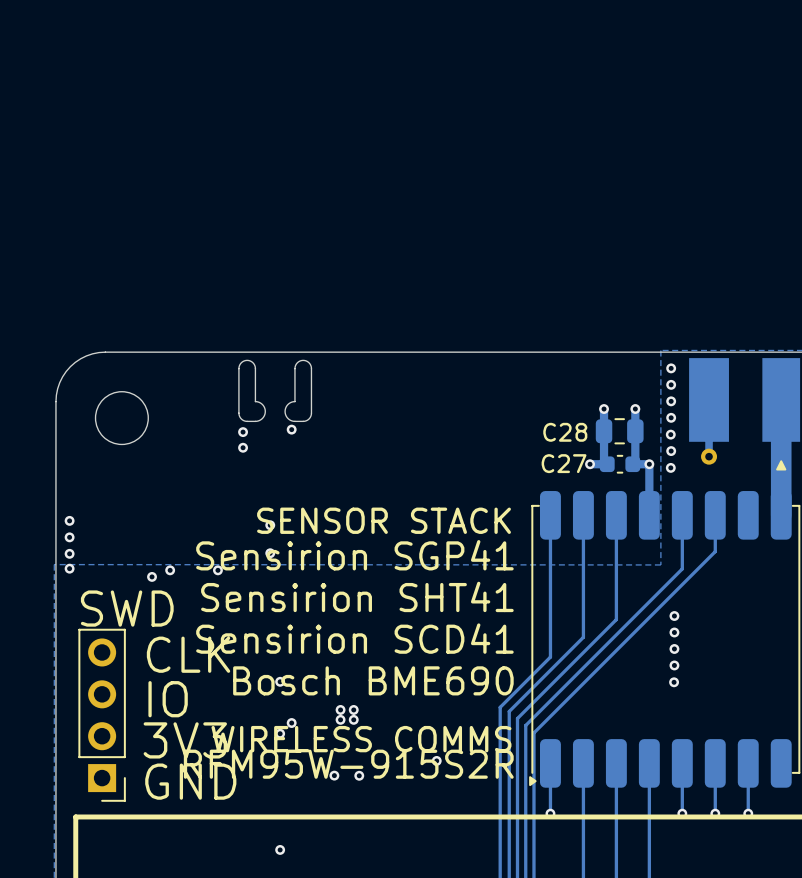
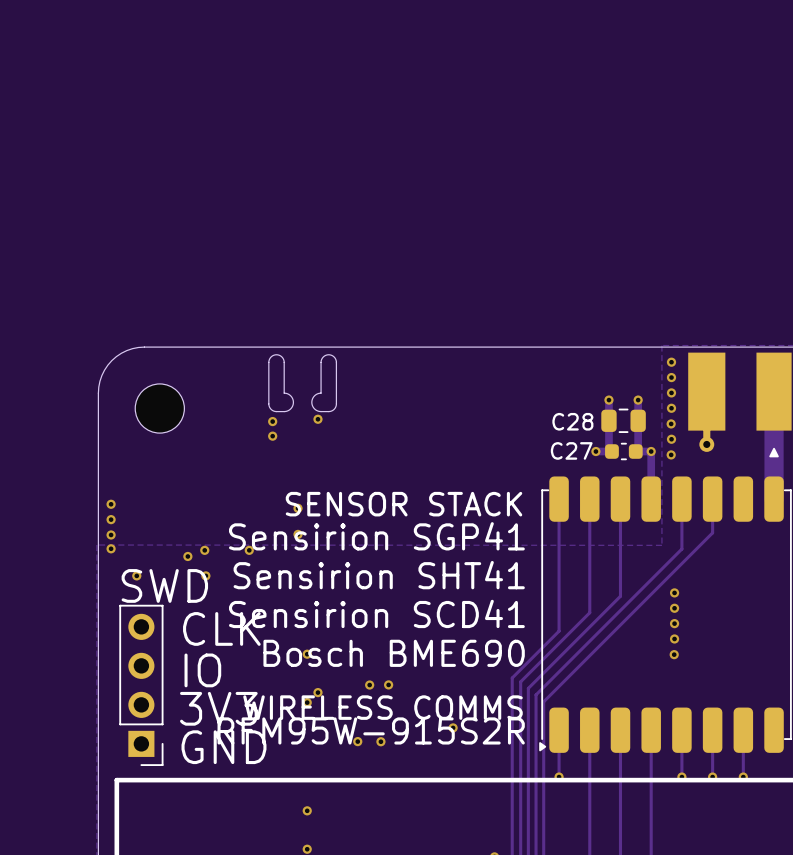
via: none -> (136, 575)
via: none -> (205, 575)
via: (340, 709) -> none
via: (353, 709) -> none
via: none -> (369, 685)
via: none -> (388, 684)
via: (340, 719) -> none
via: (353, 719) -> none

